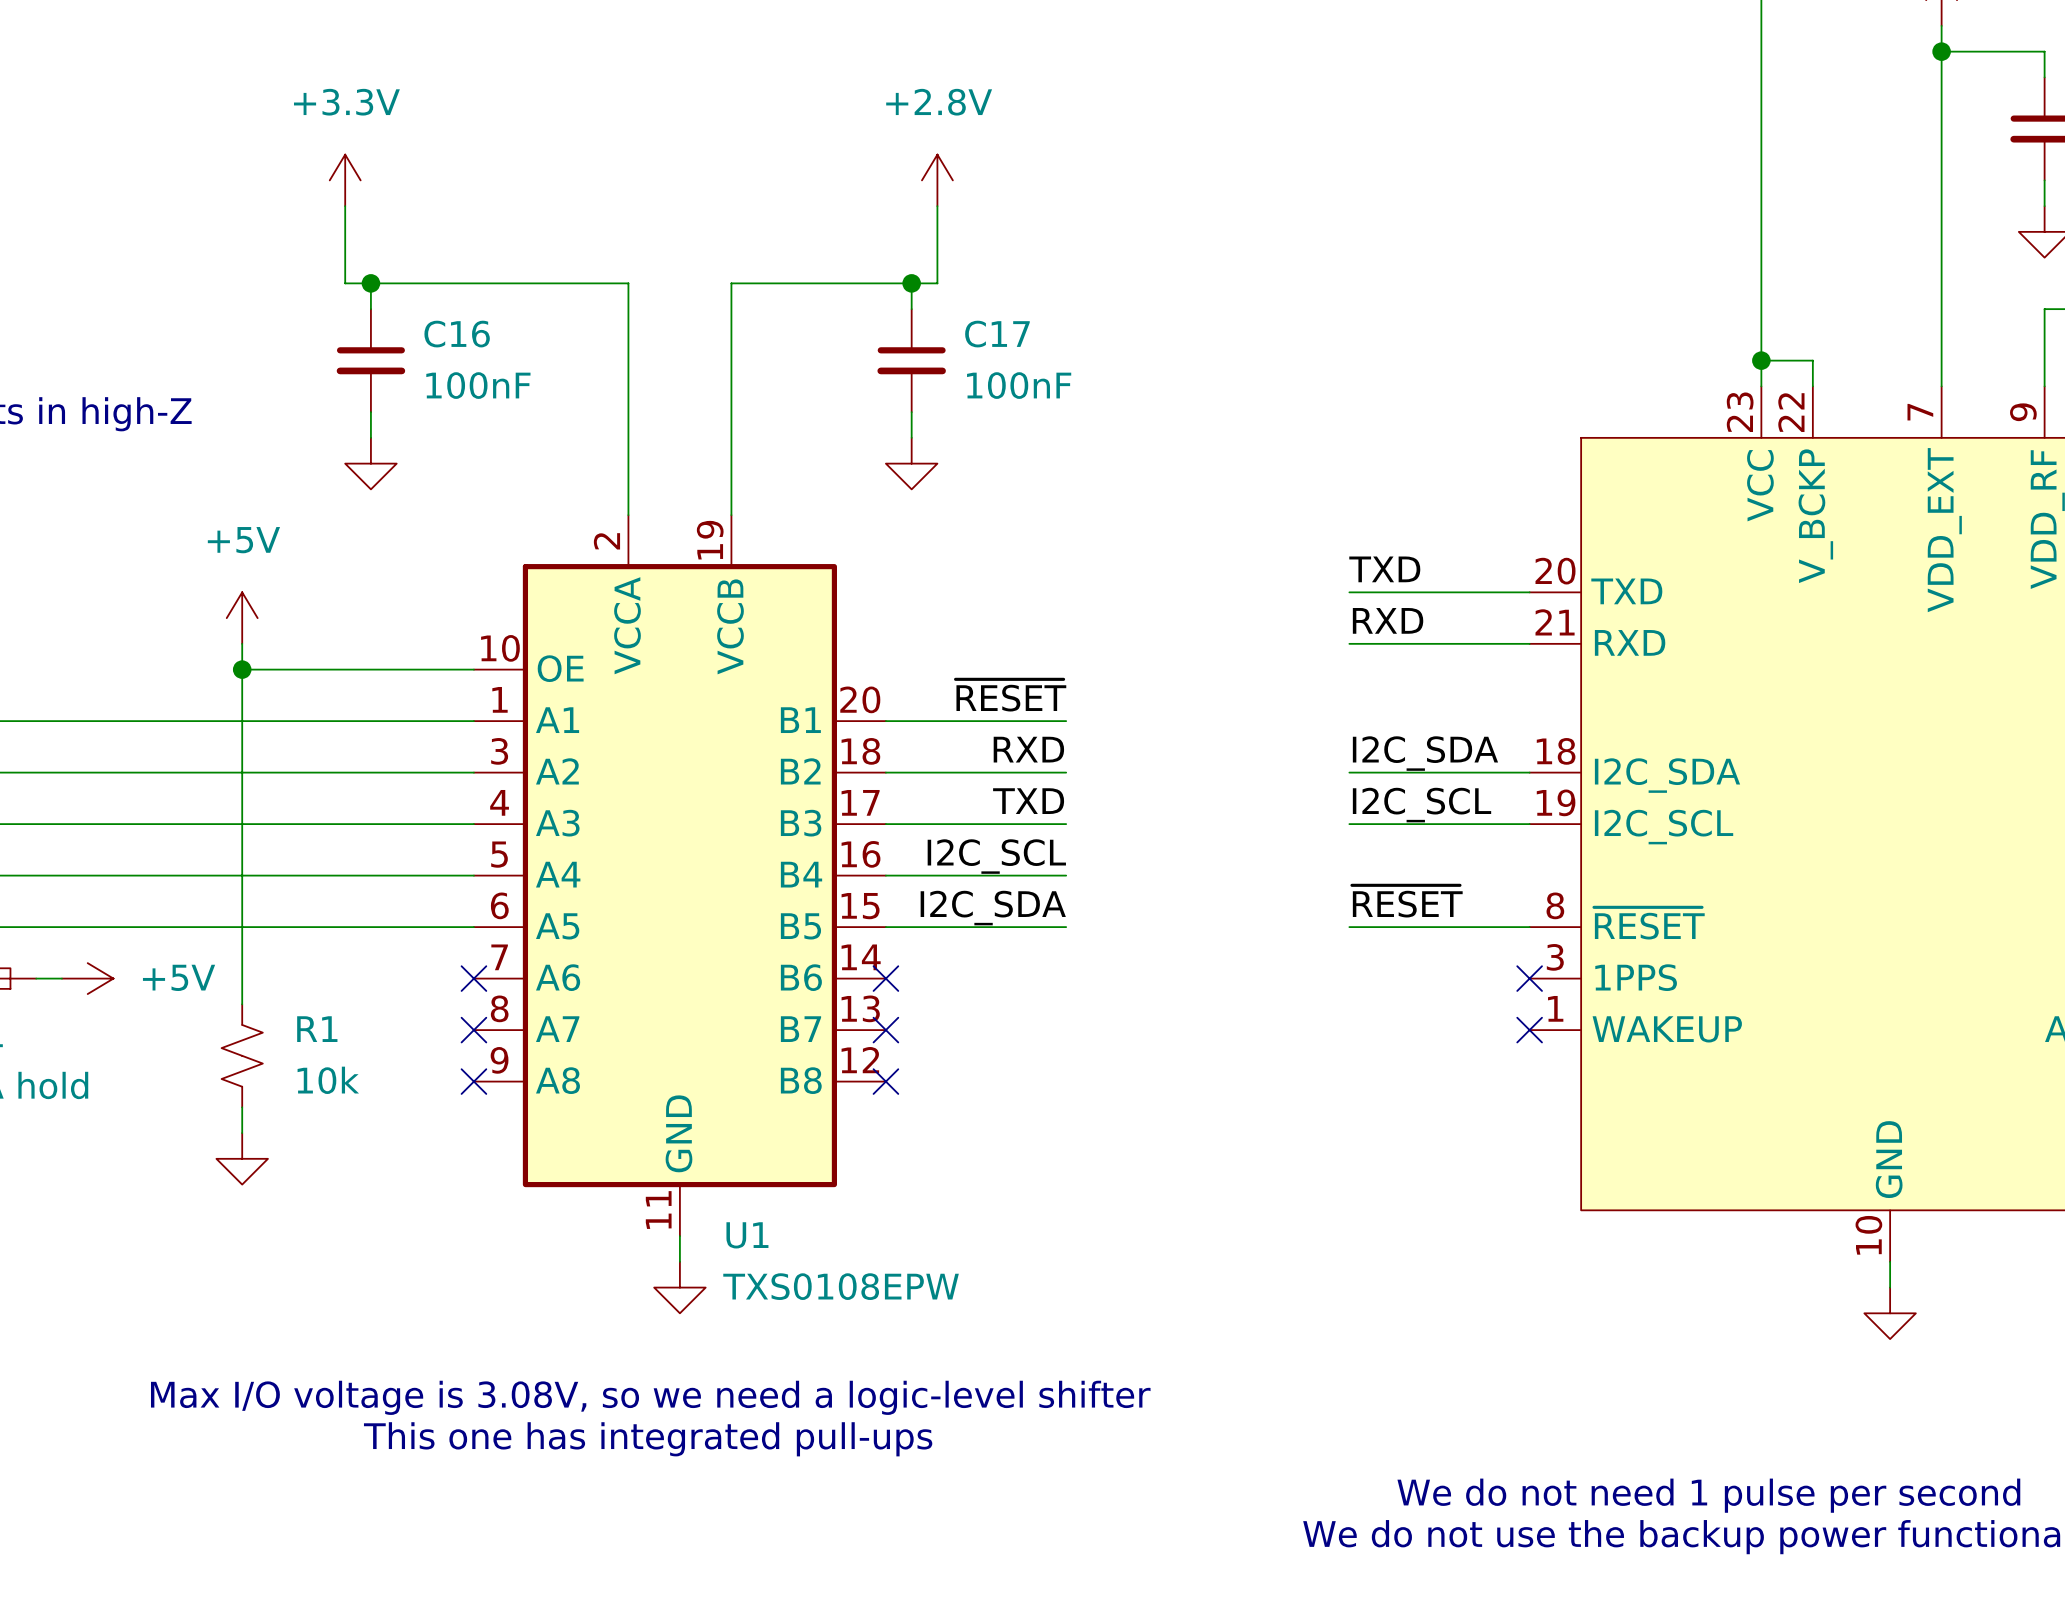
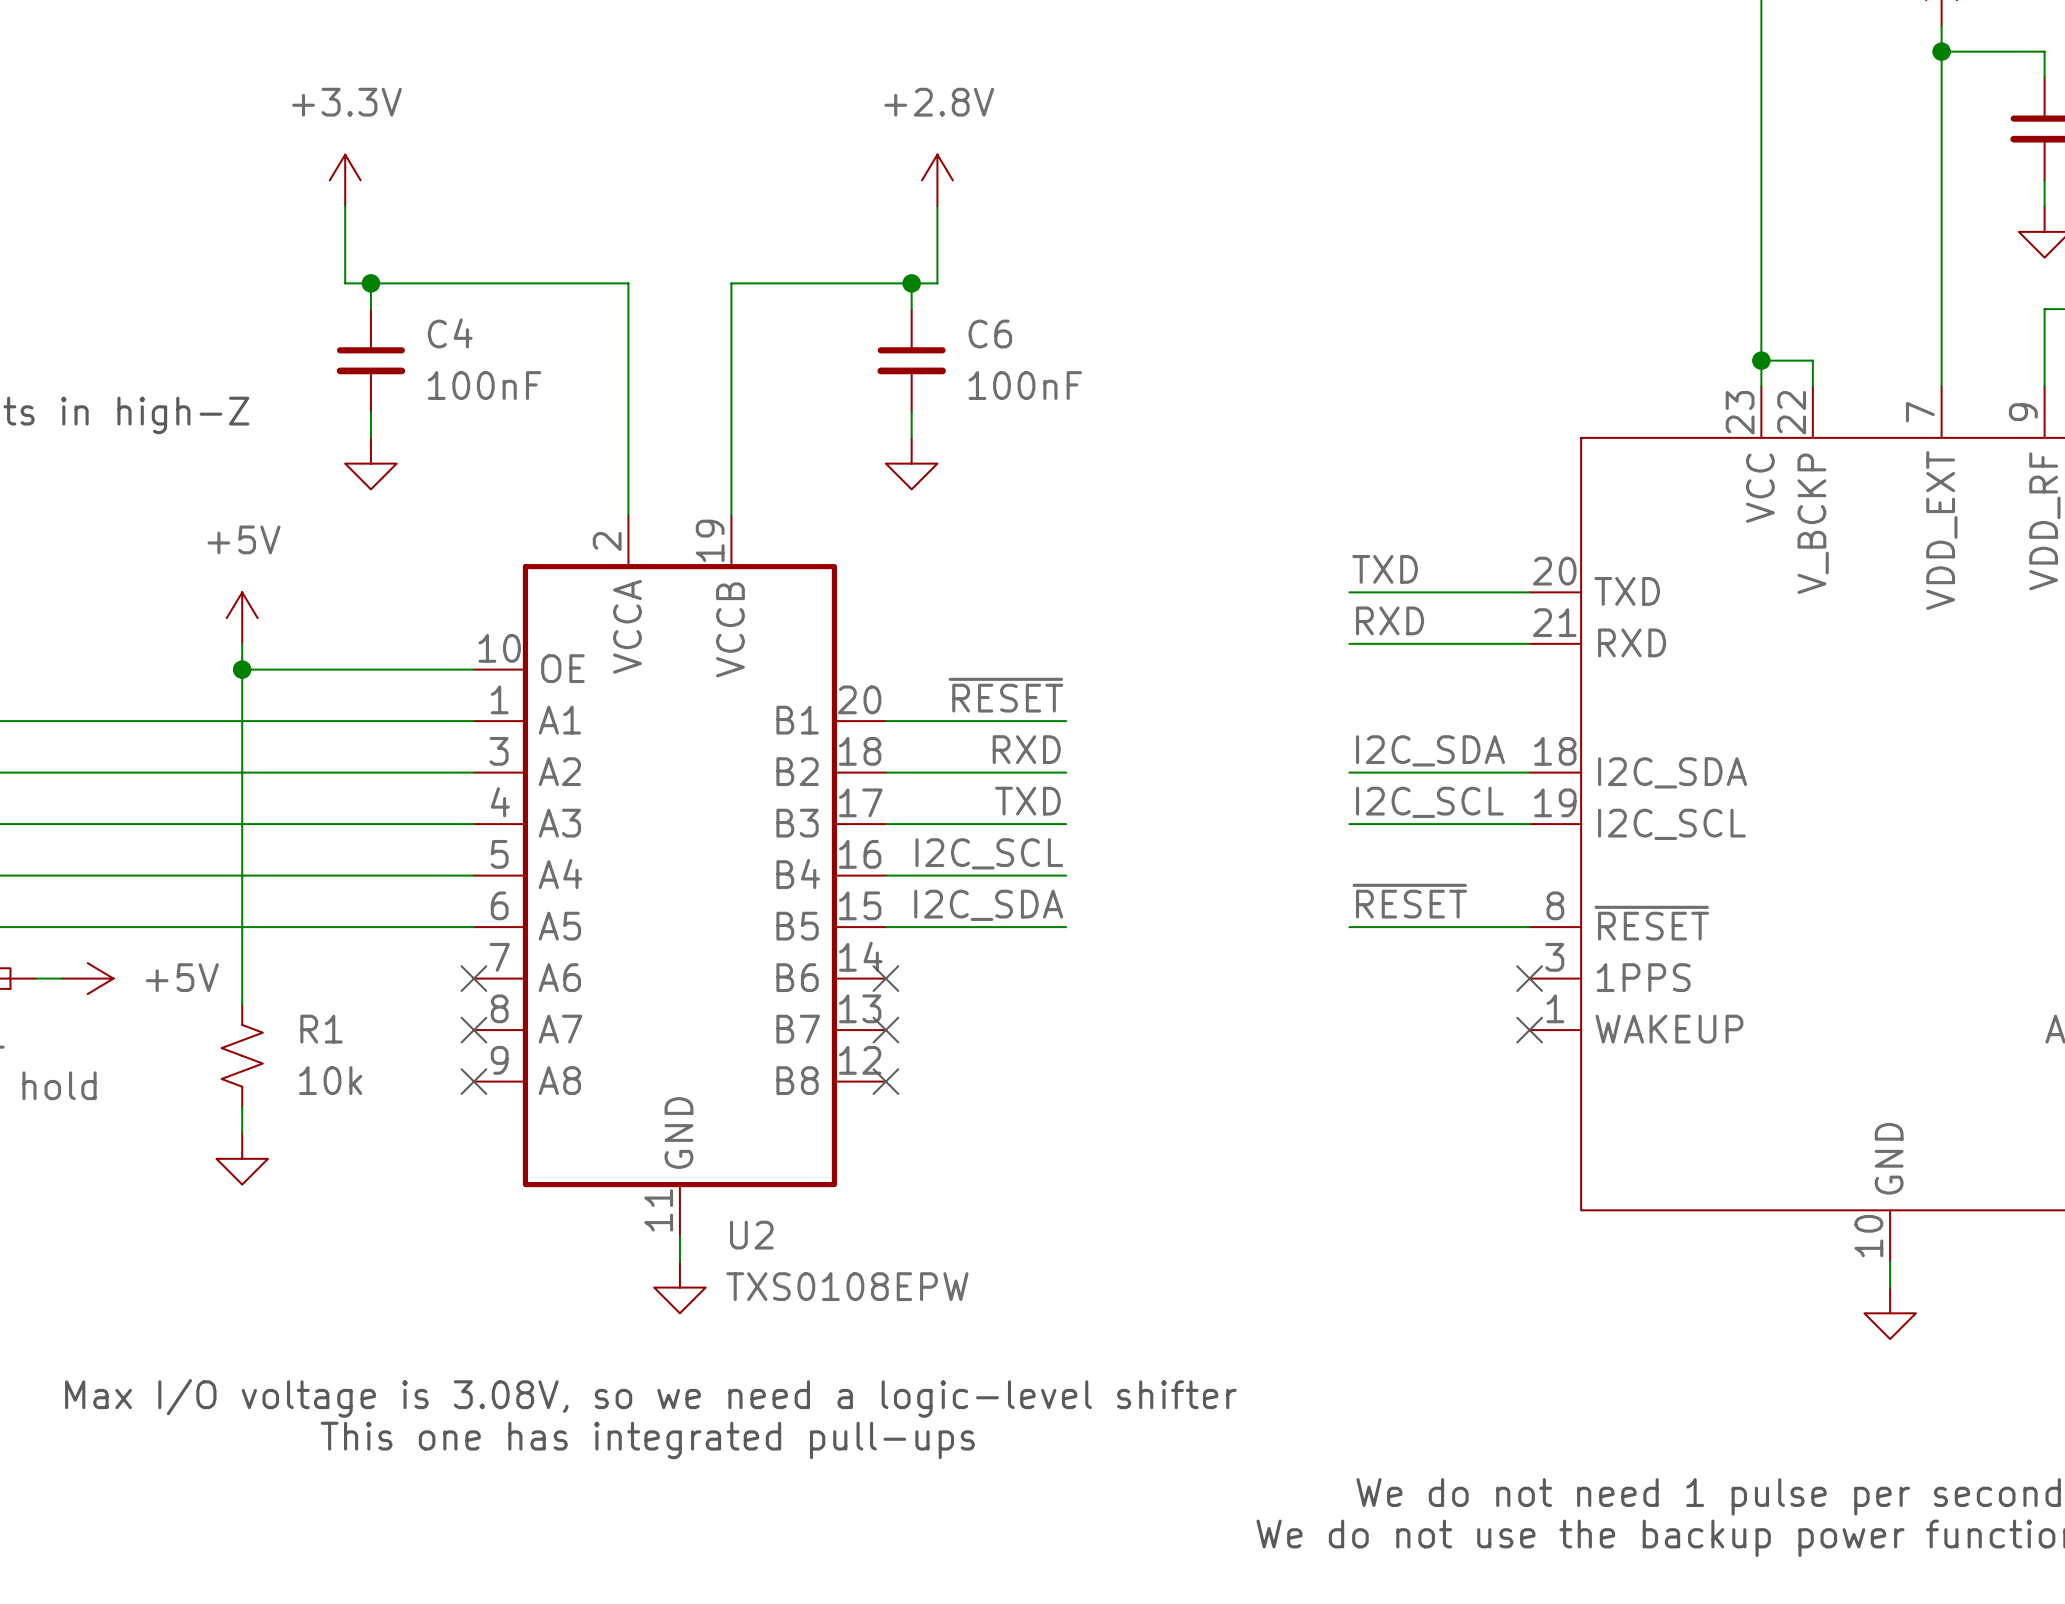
C16 name: C16 (457, 334) -> C4 (450, 333)
C17 name: C17 (997, 334) -> C6 (990, 334)
U1 name: U1 (747, 1235) -> U2 (751, 1235)

